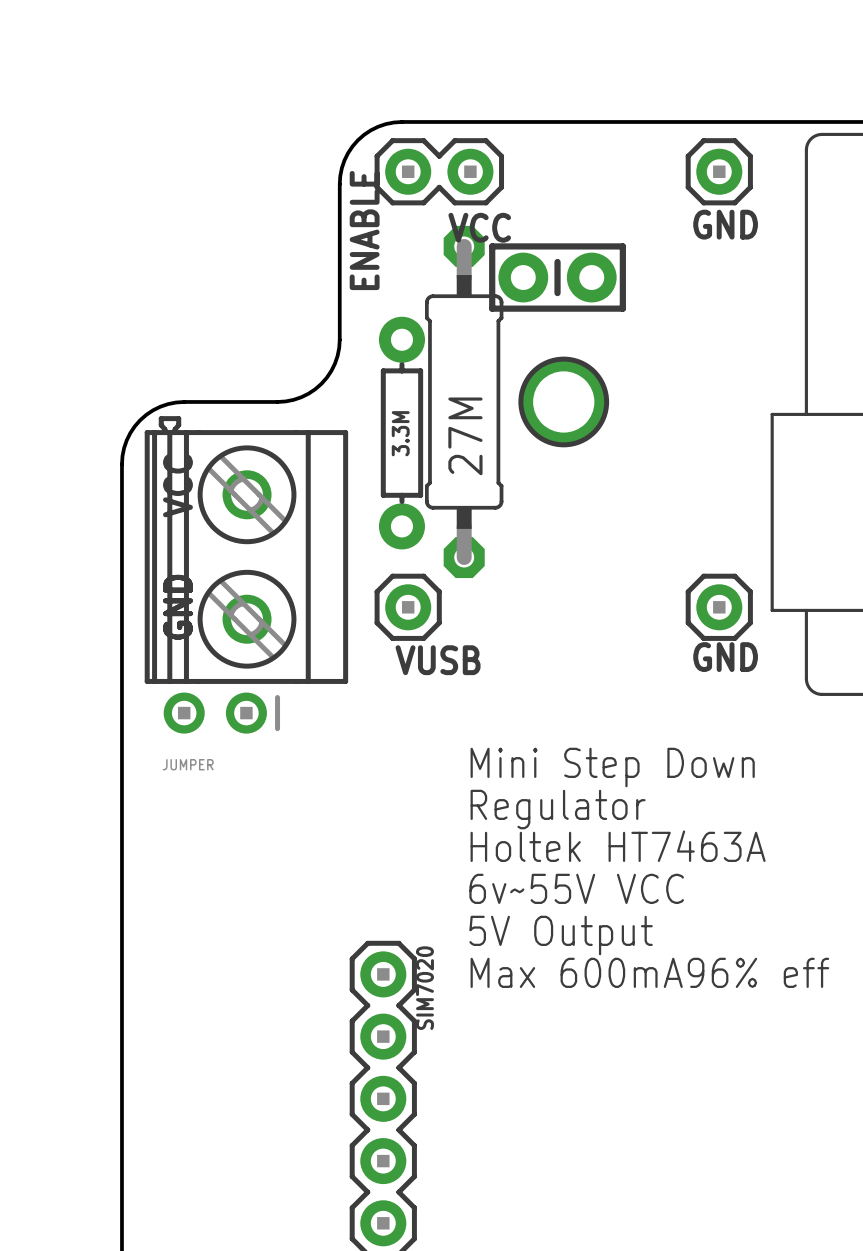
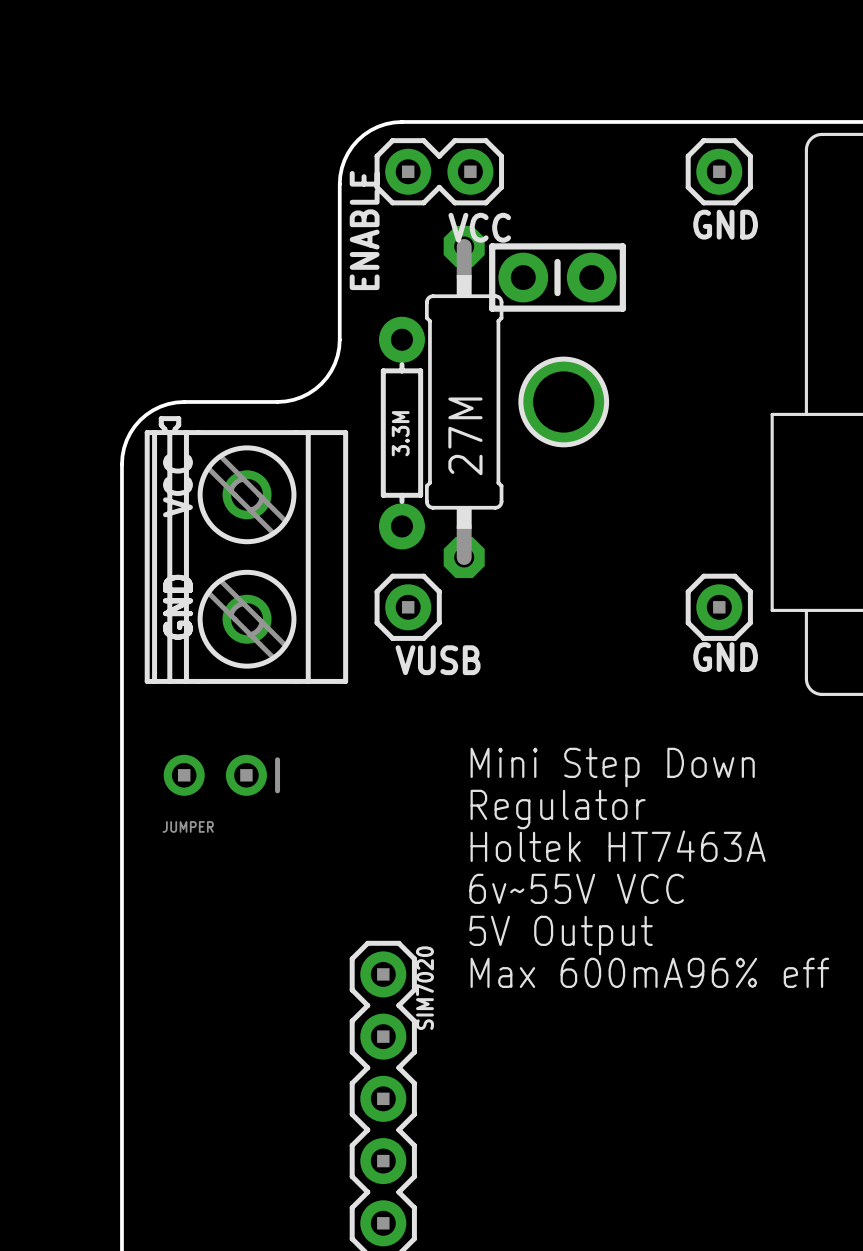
part position: (221, 713) -> (221, 775)

